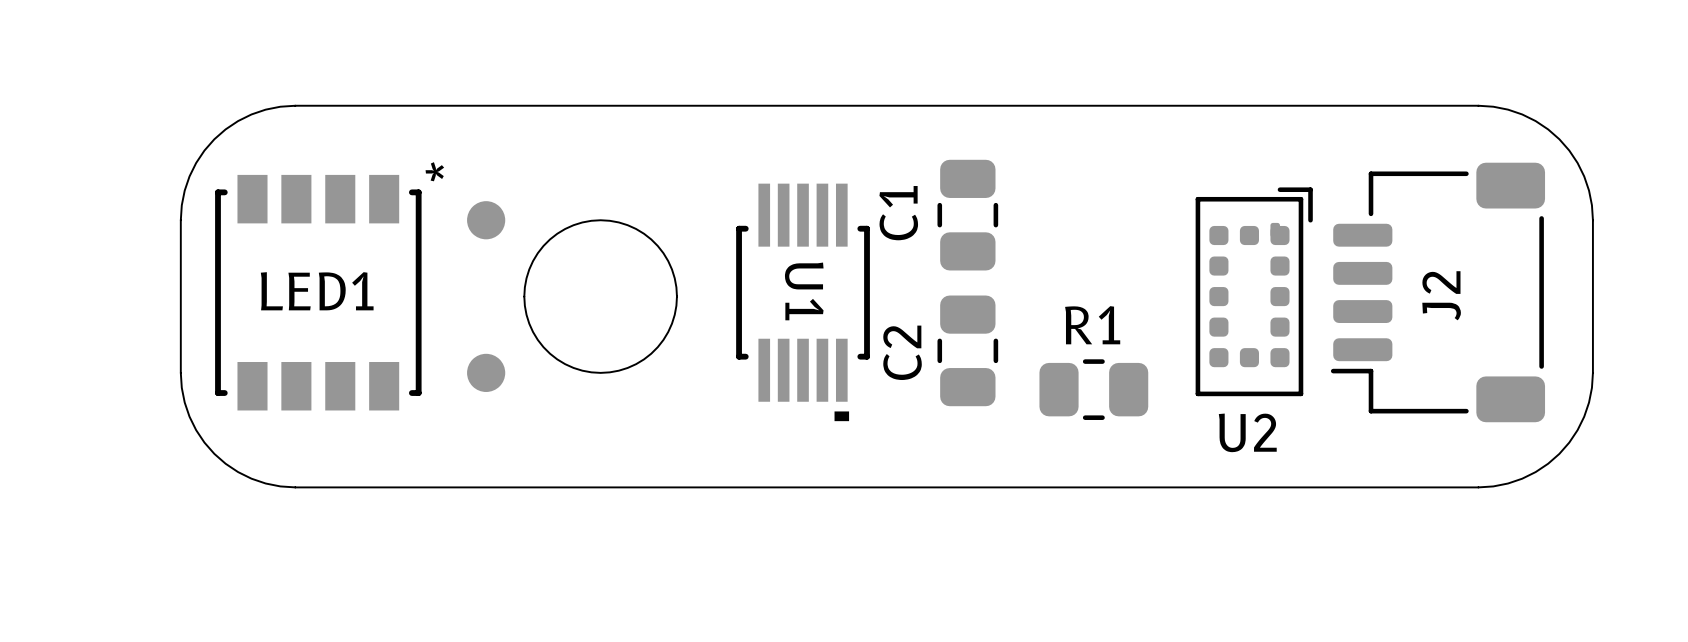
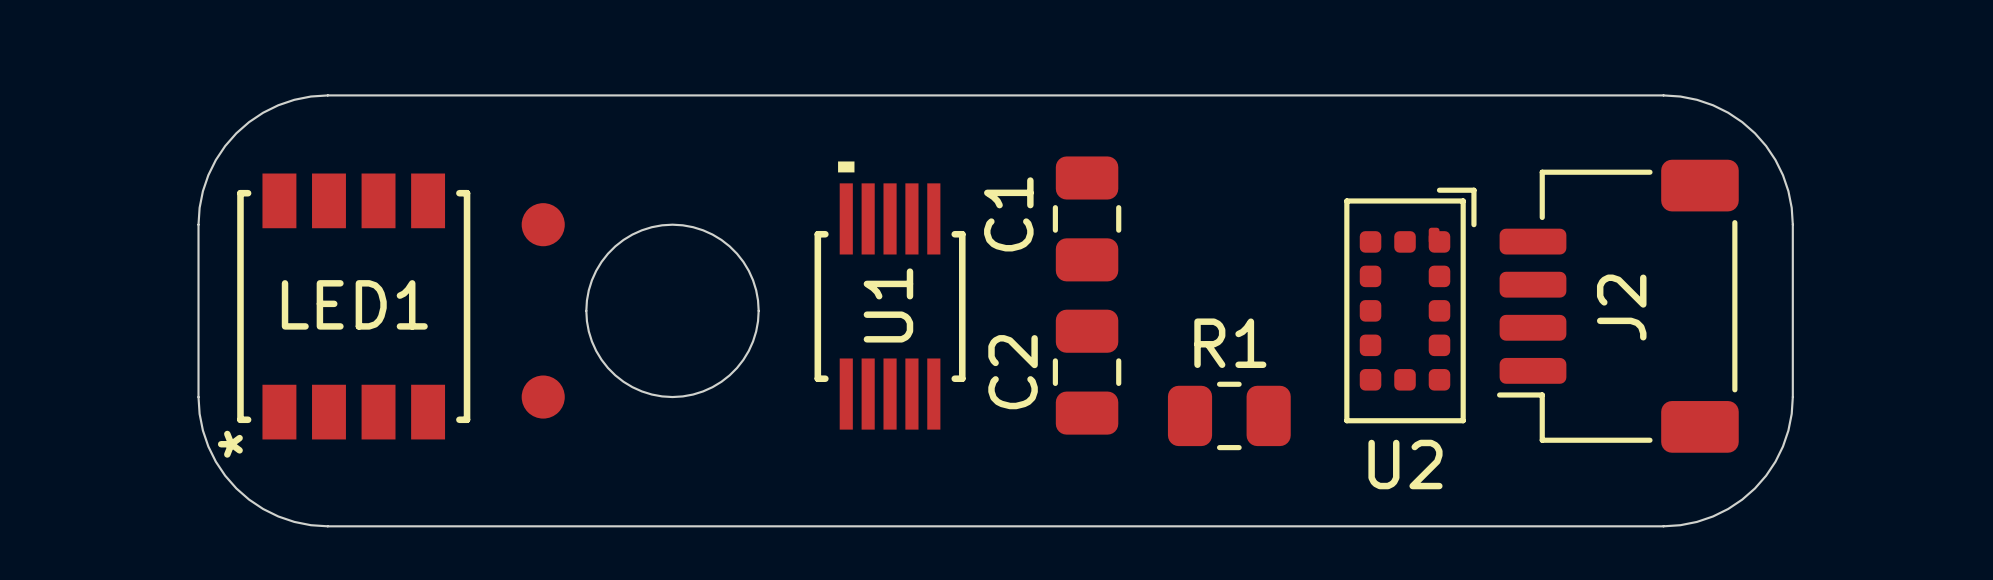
LED1 text position: * (434, 171) -> * (230, 444)
U1 rotation: 0° (803, 302) -> 180° (890, 295)

